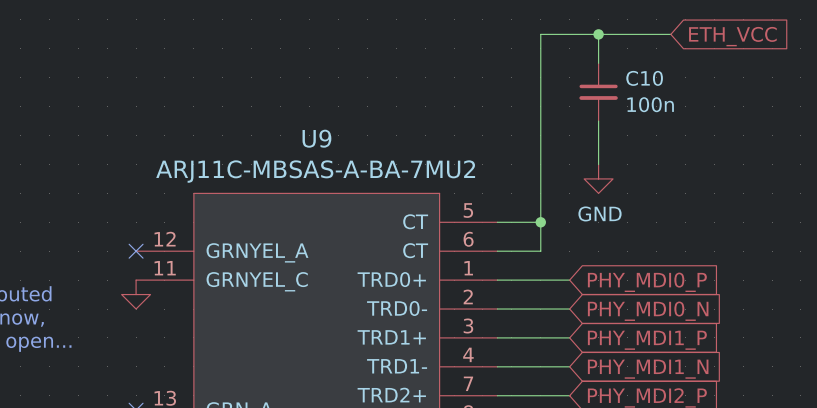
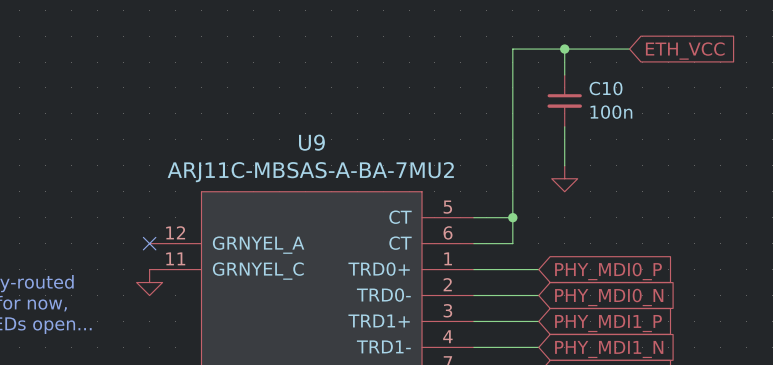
power symbol text: GND (600, 213) -> none

